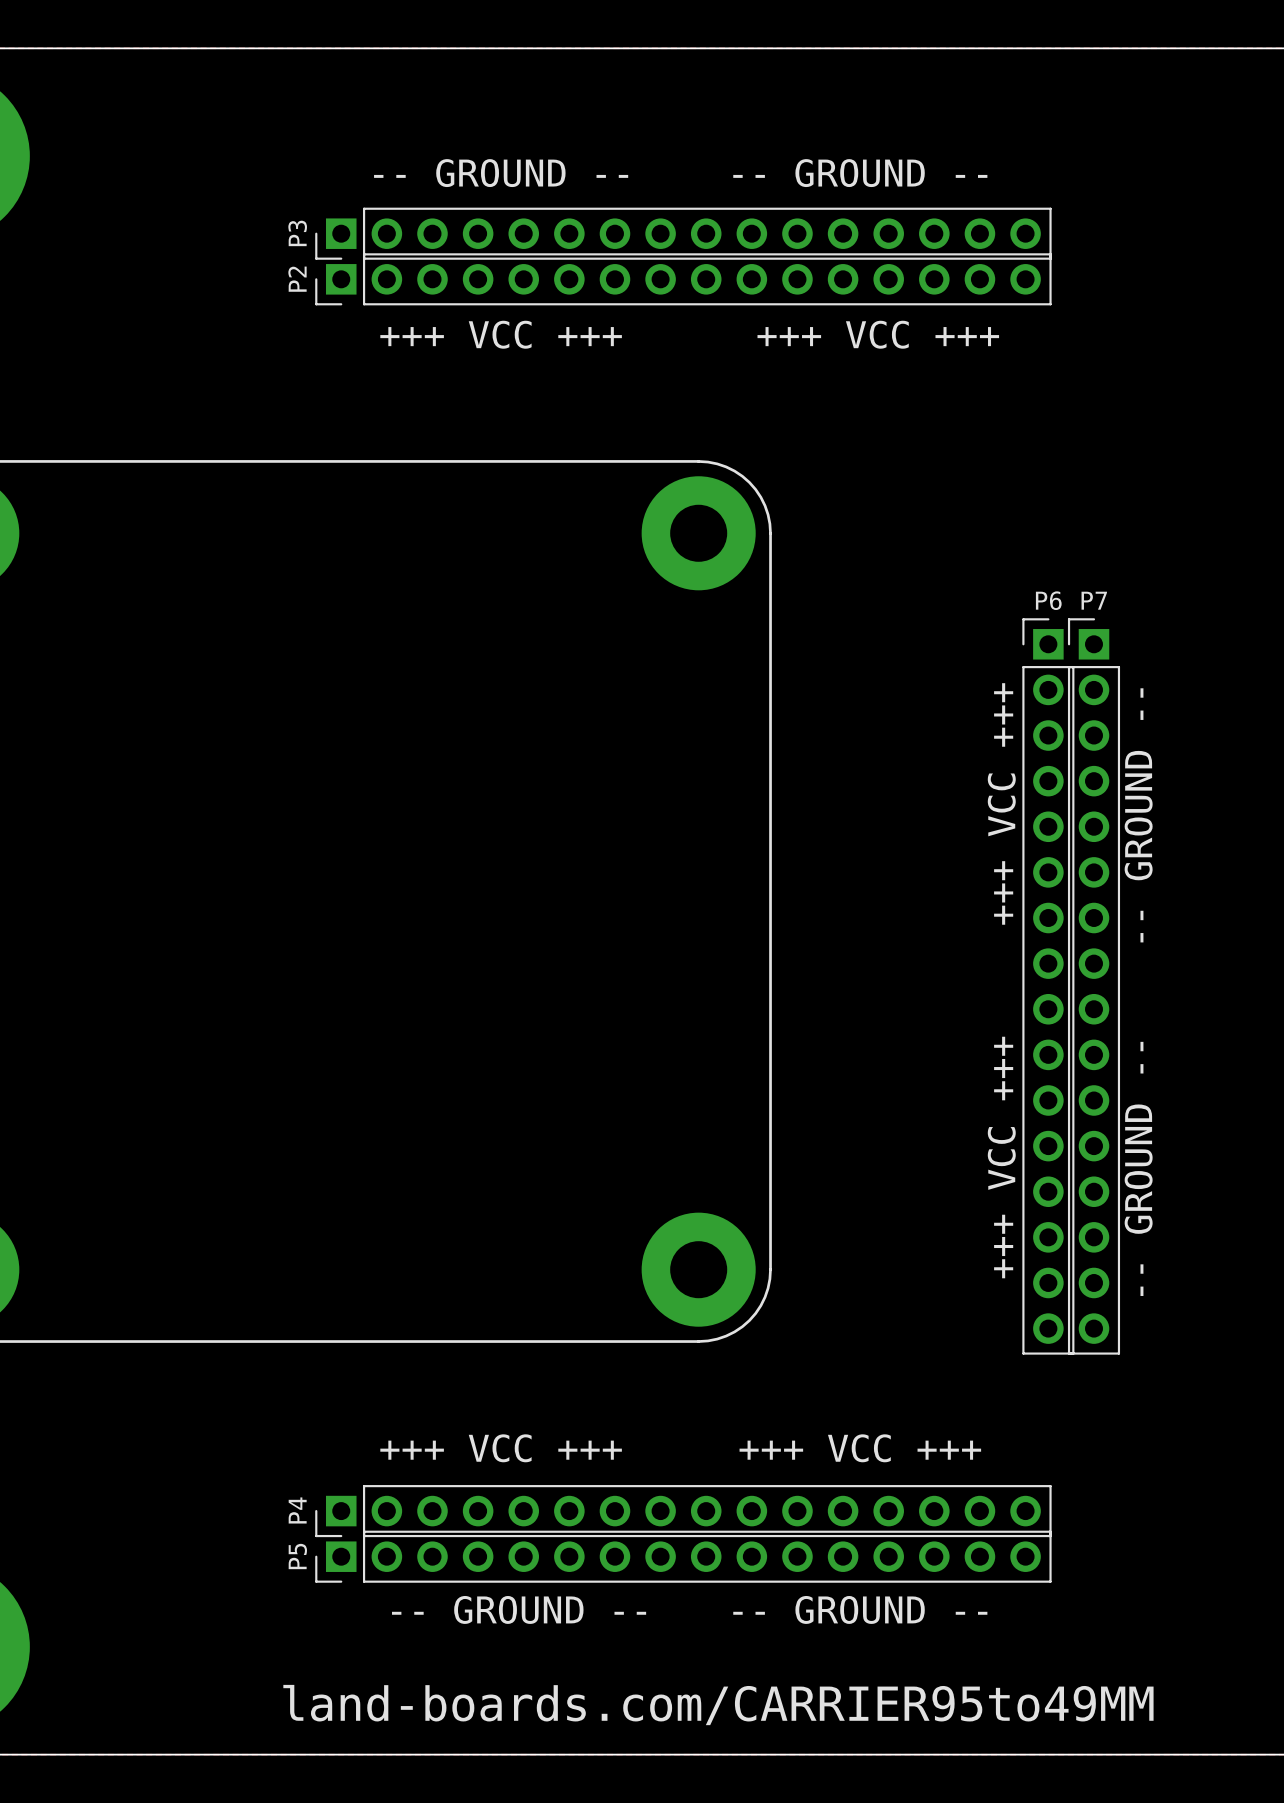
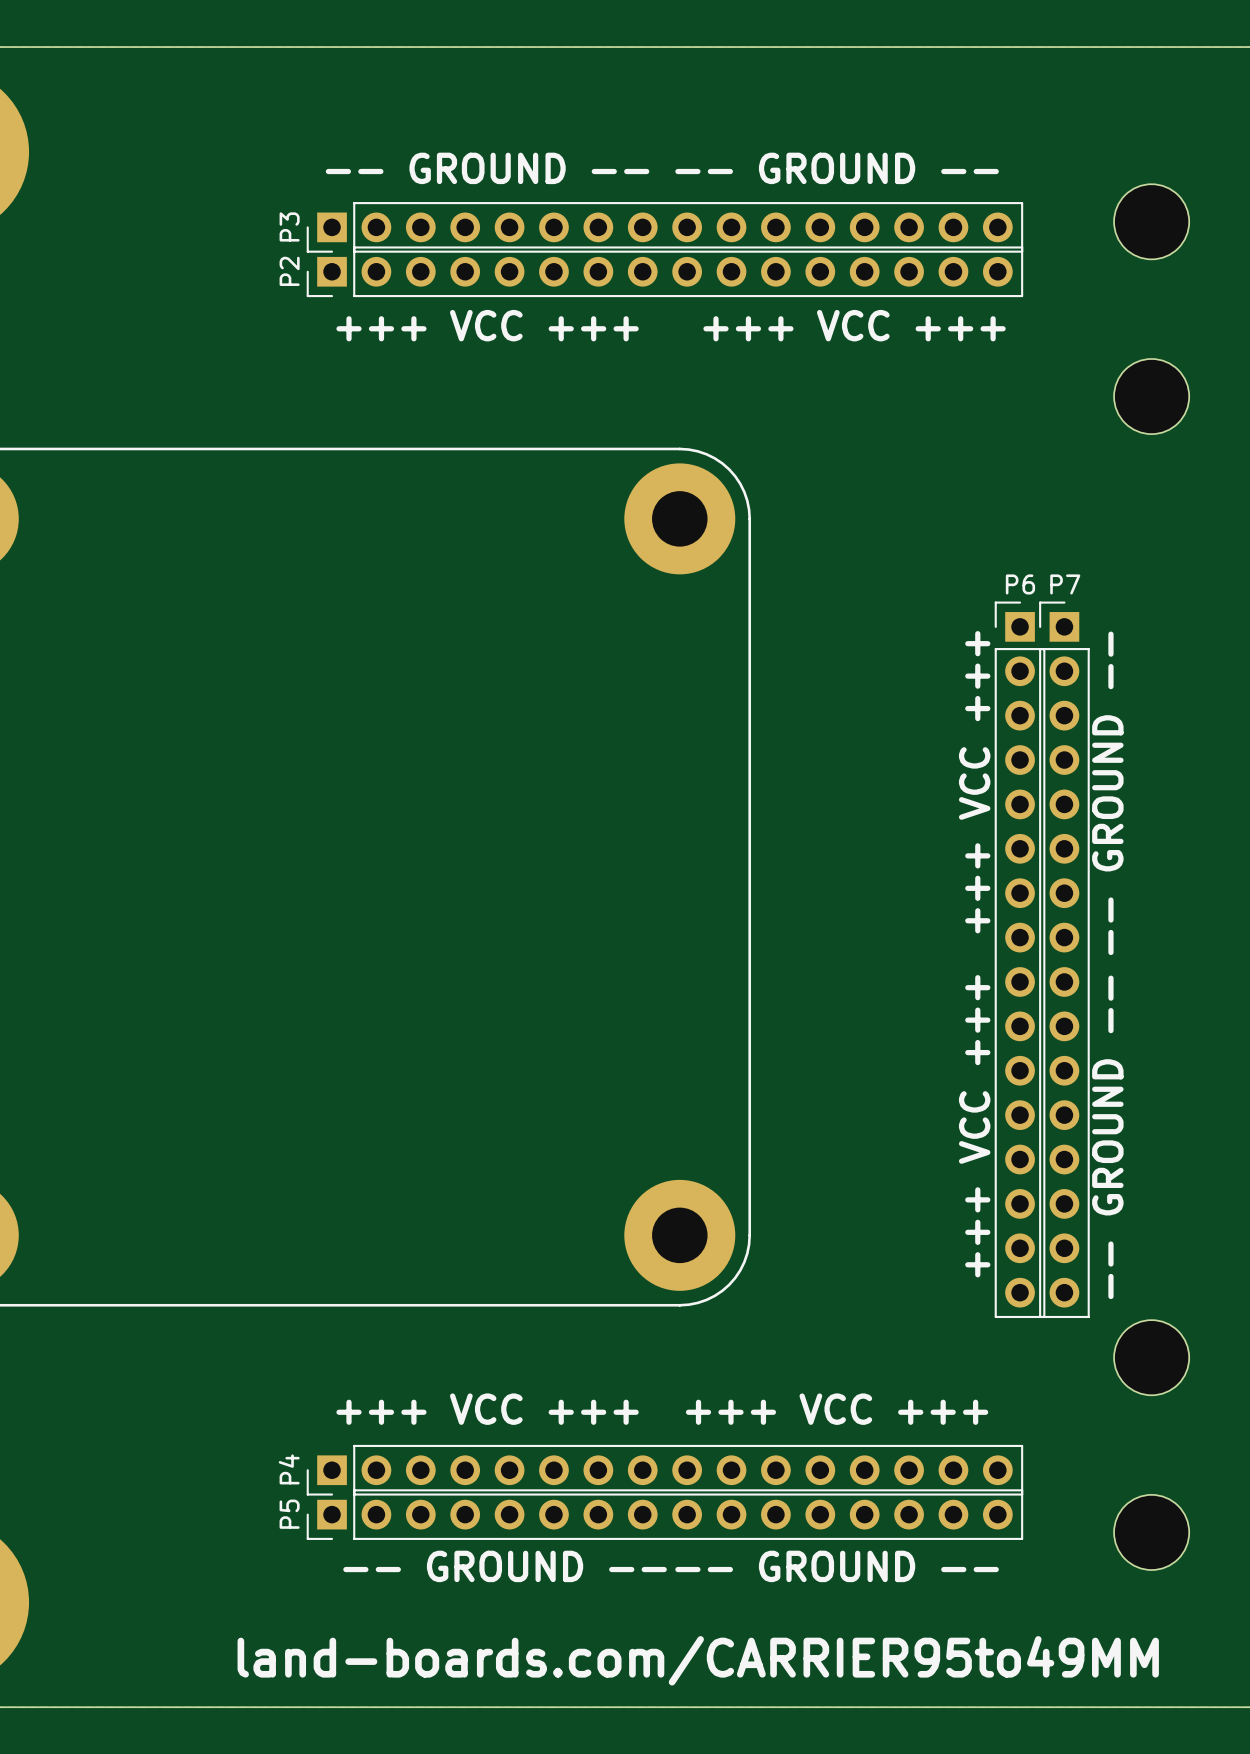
part: none -> (1151, 221)
part: none -> (1151, 396)
part: none -> (1151, 1357)
part: none -> (1151, 1532)

